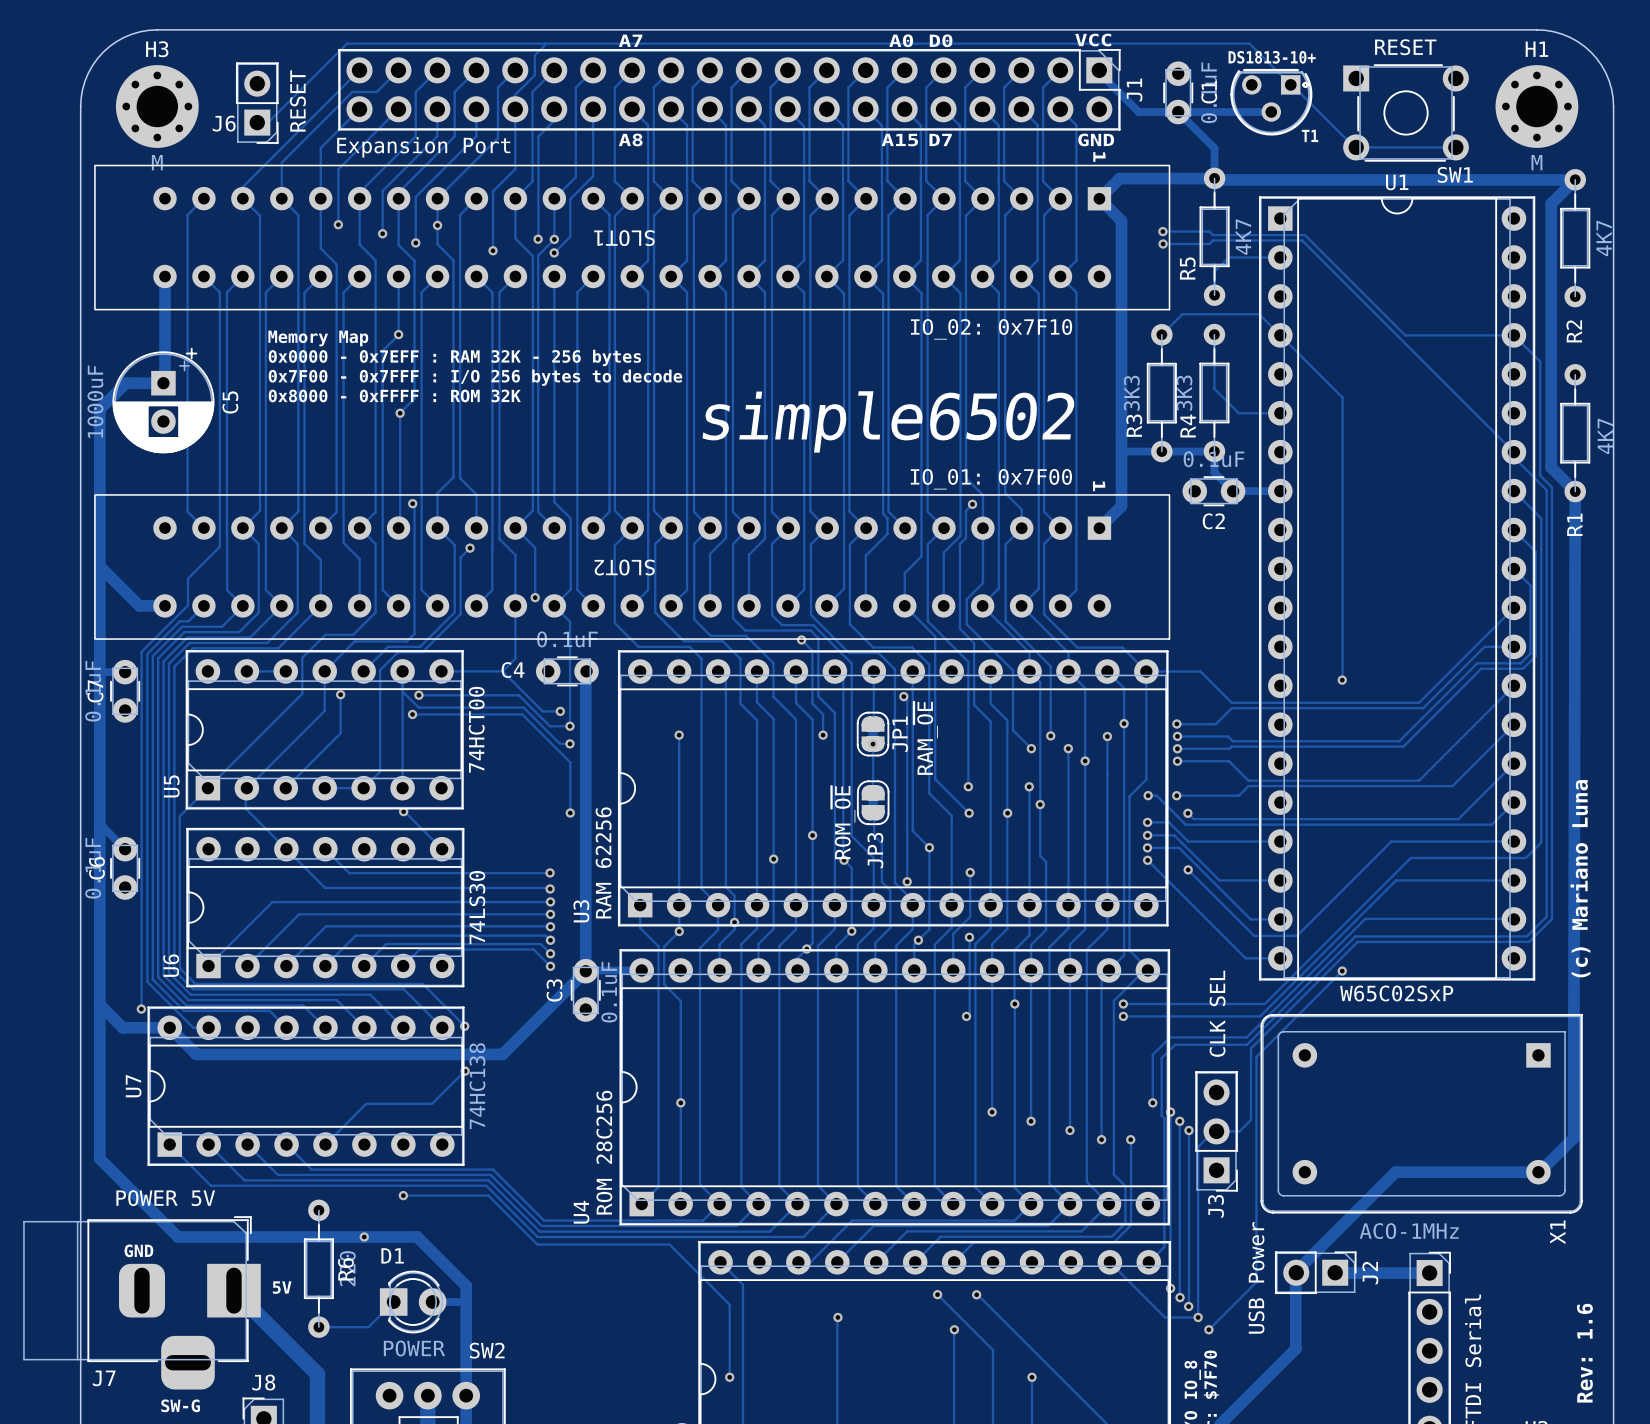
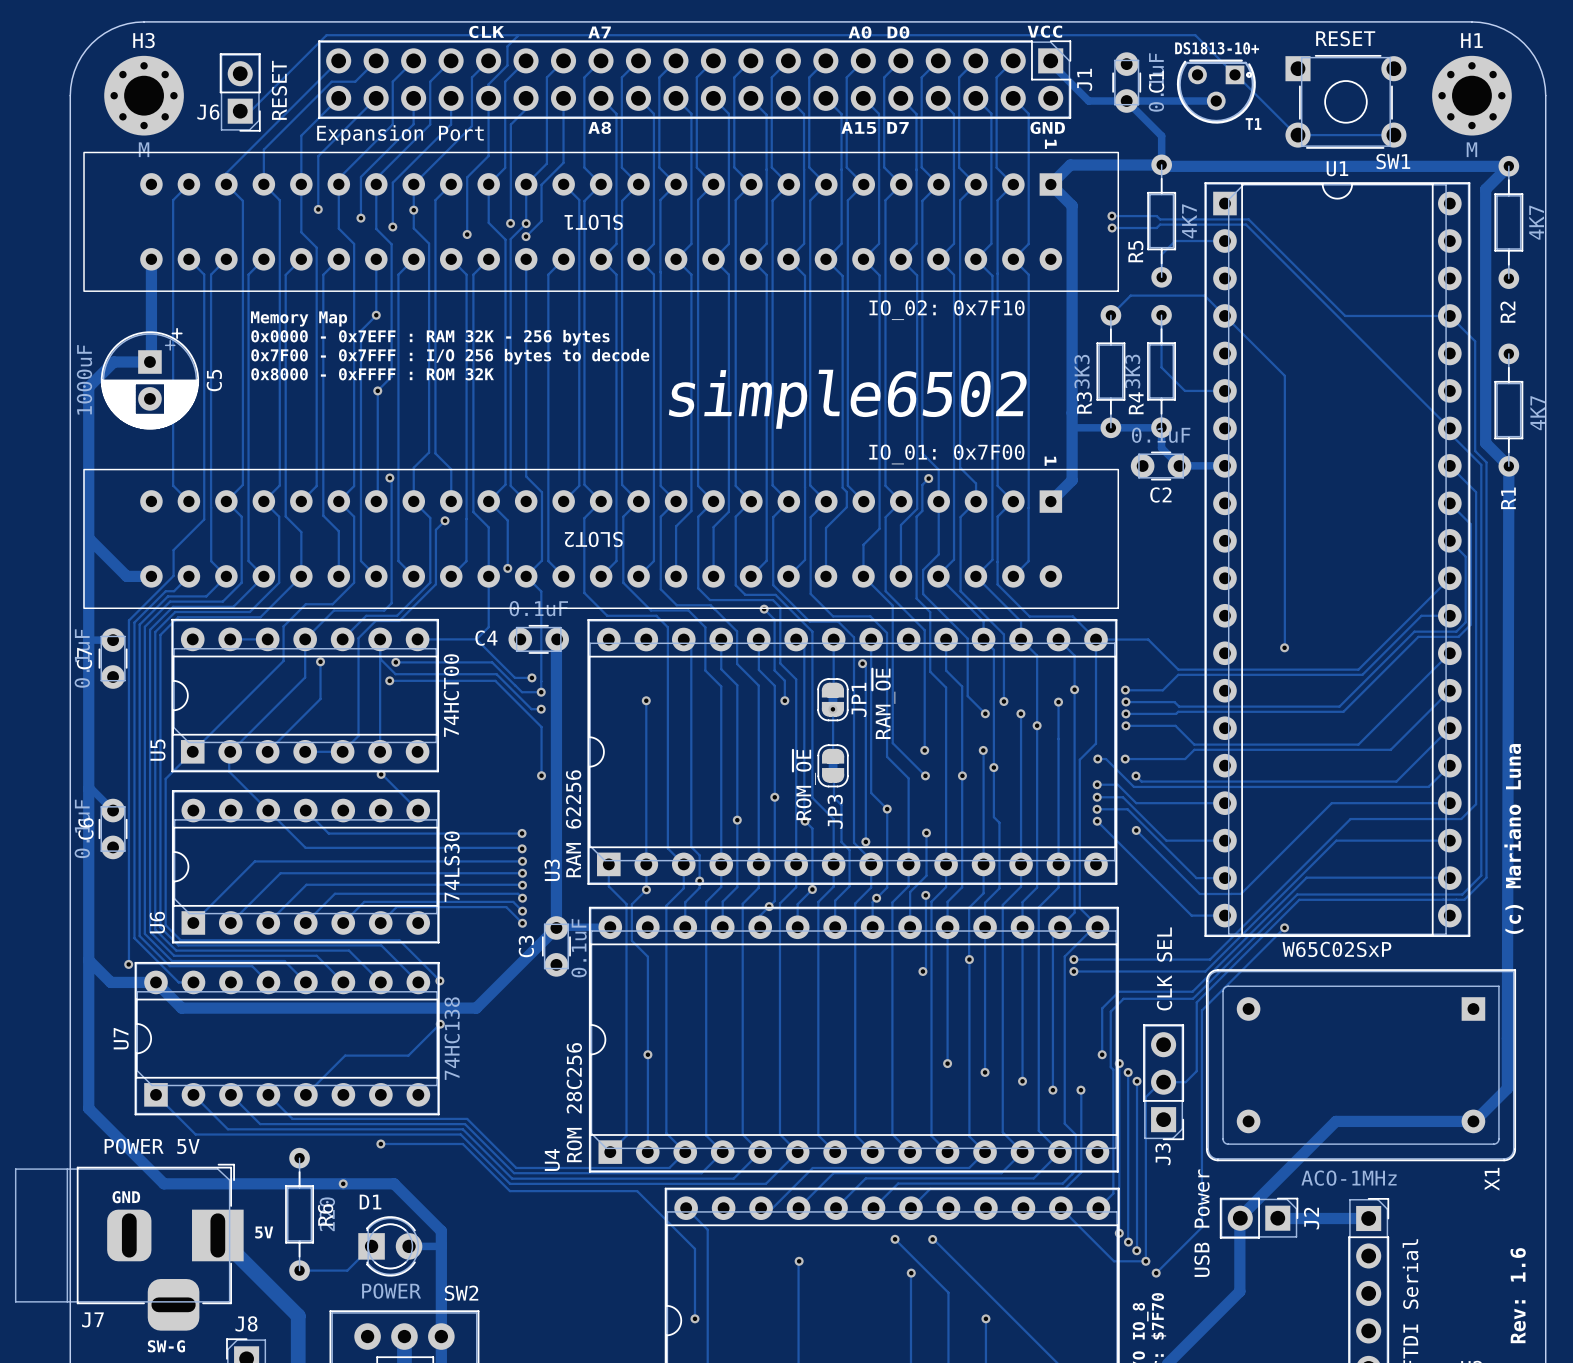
text: none -> CLK (486, 31)

